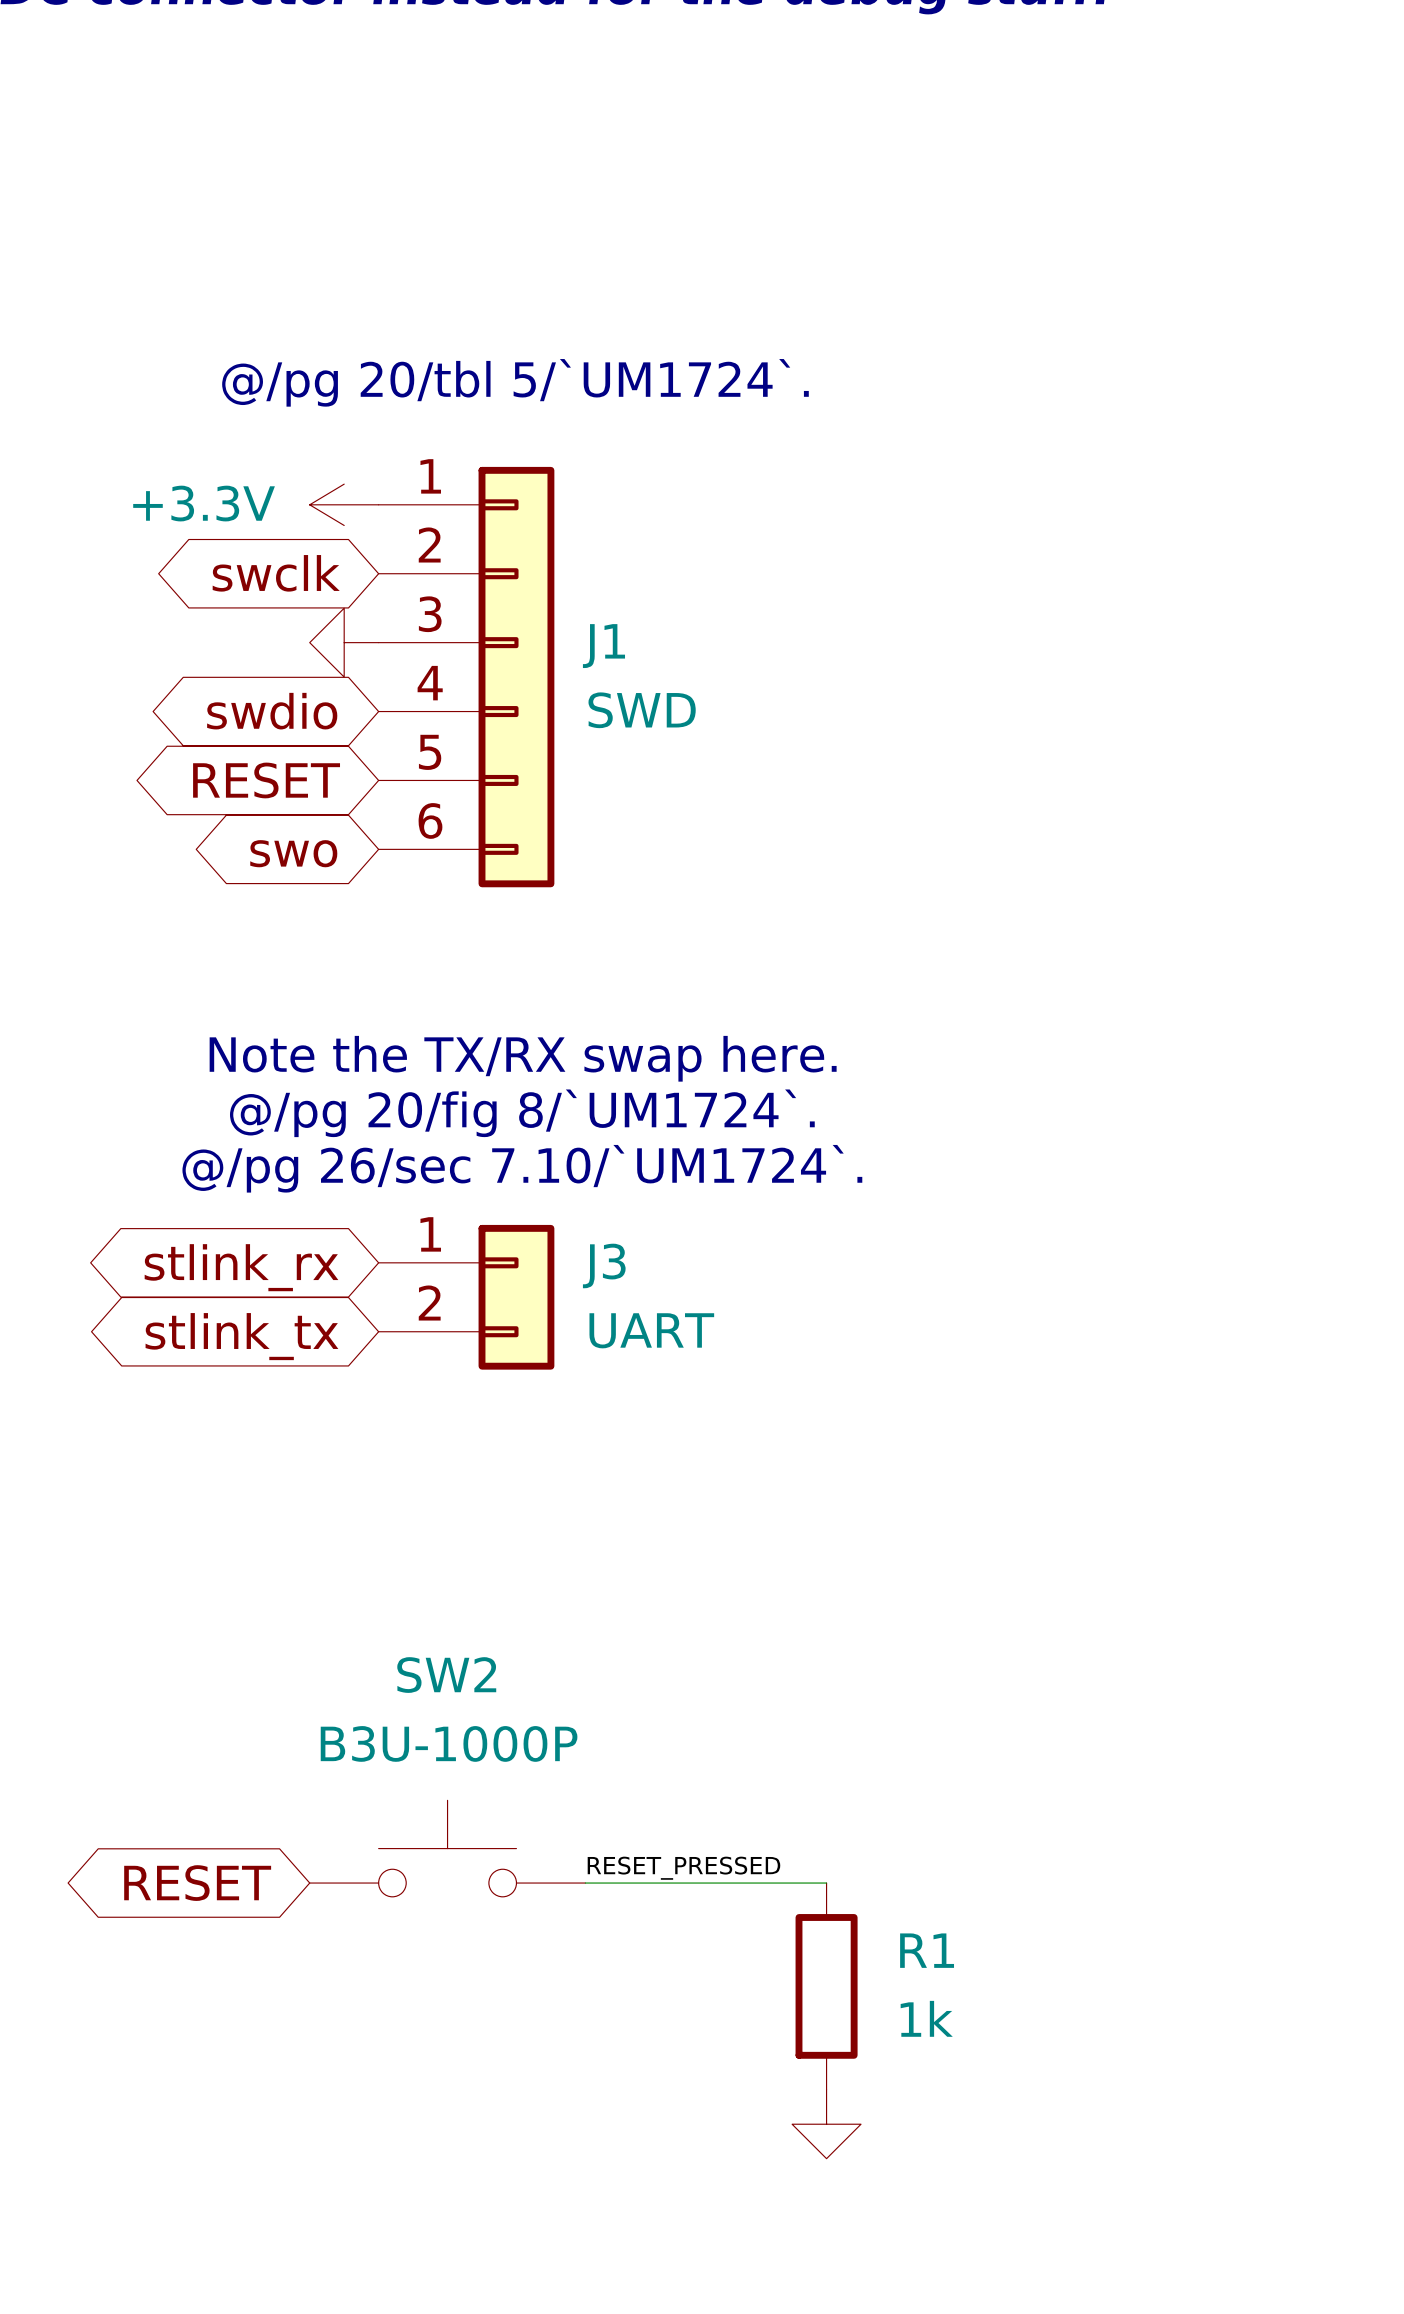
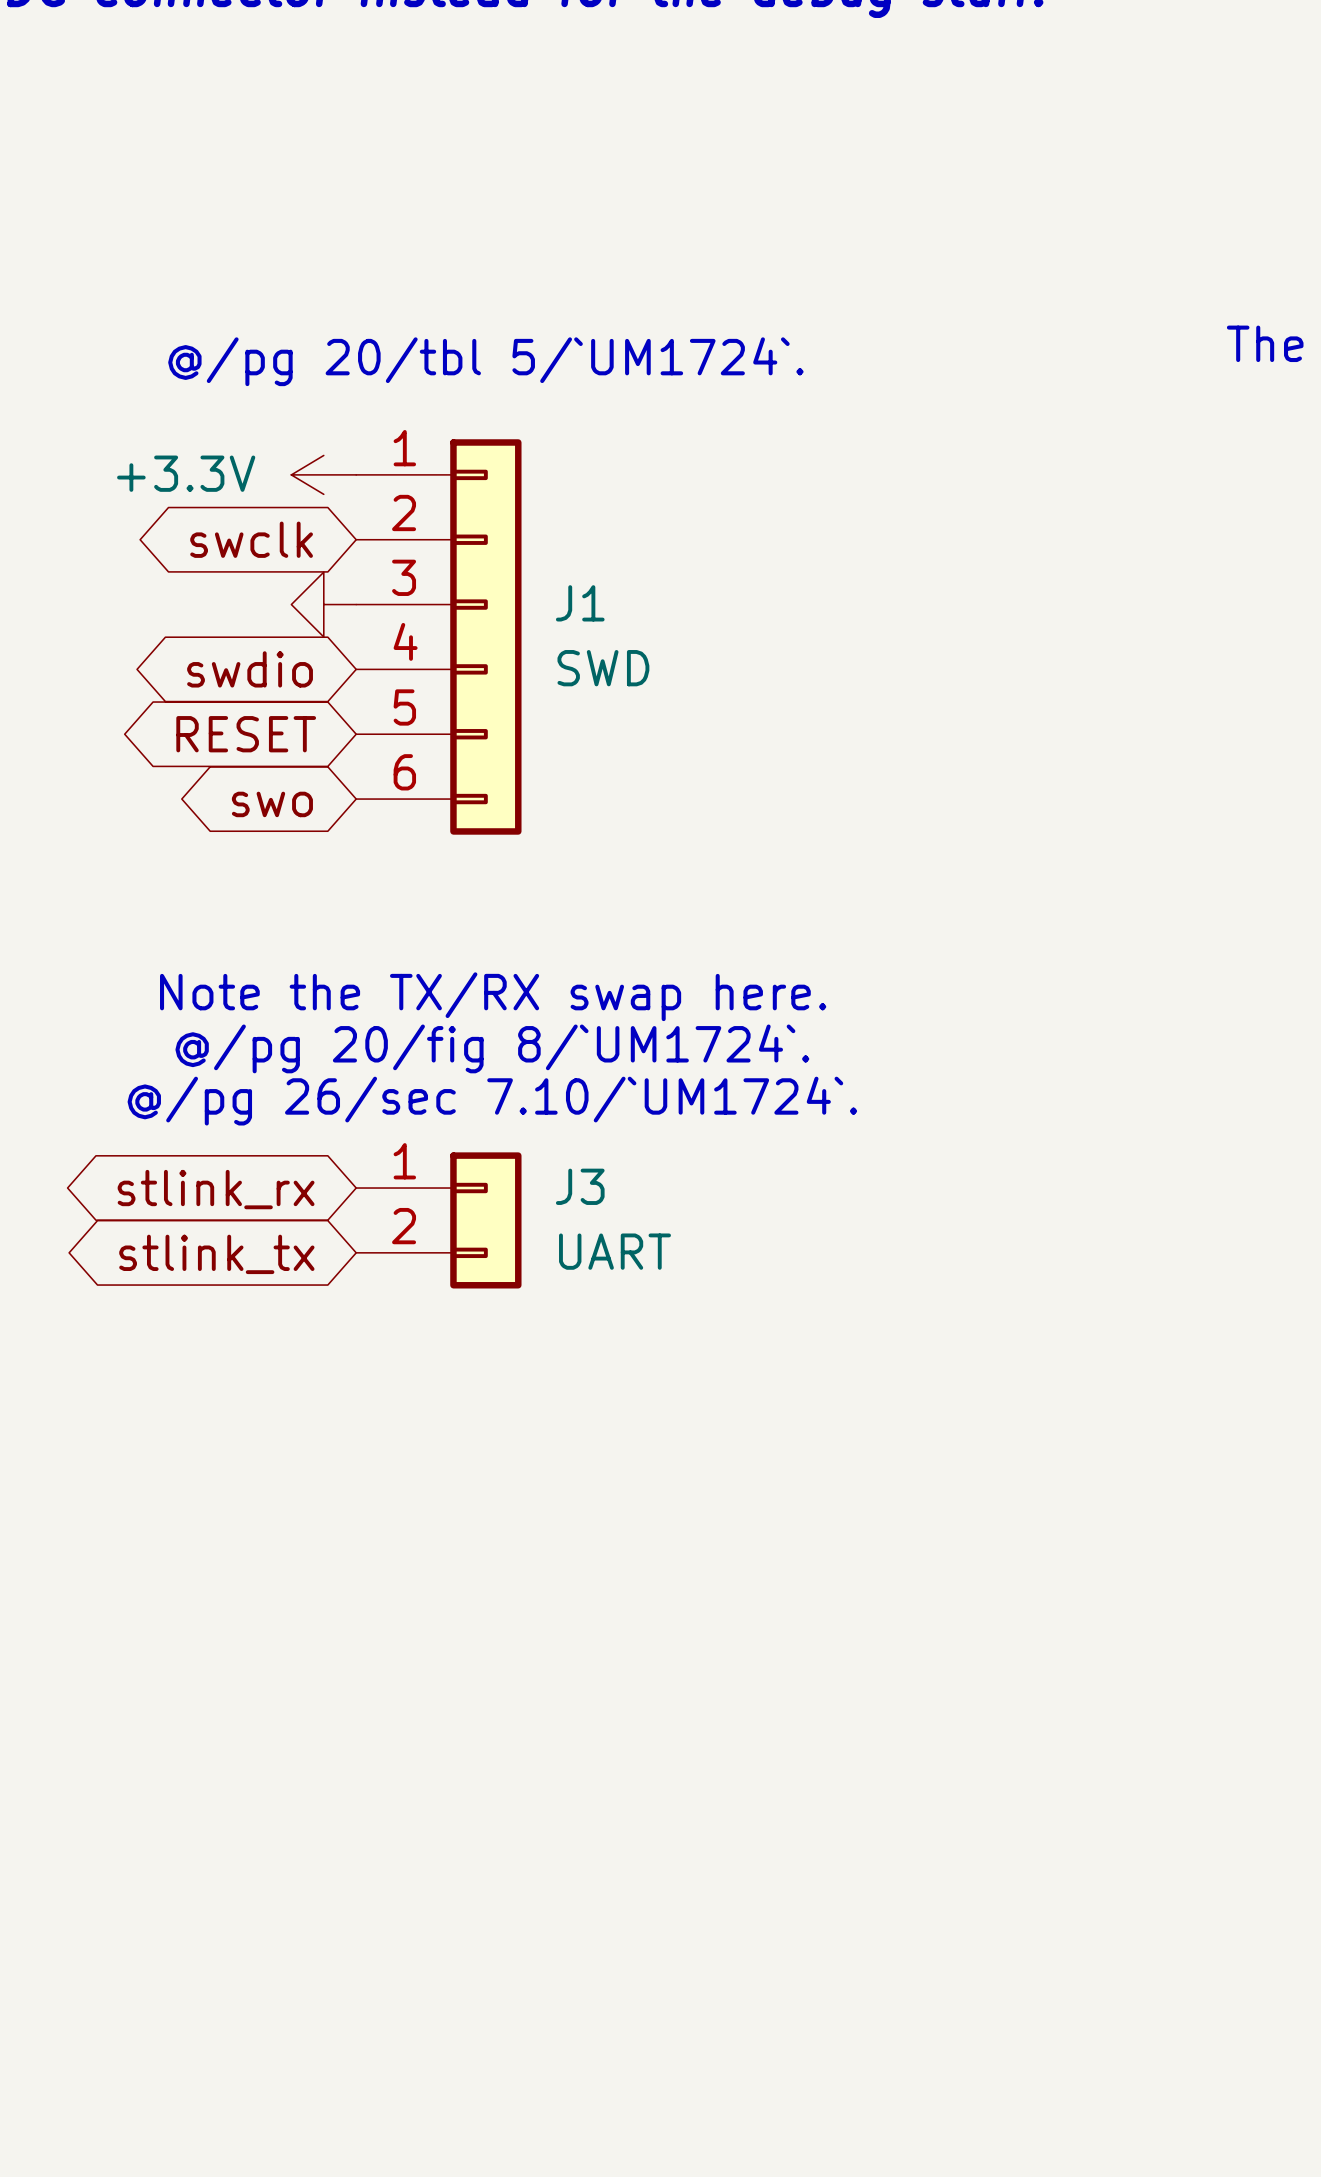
SW2: B3U-1000P (447, 1848) -> none
label: RESET_PRESSED (683, 1868) -> none
global label: RESET (197, 1883) -> none
wire: (585, 1883) (826, 1883) -> none
R1: 1k (826, 1986) -> none
power symbol: (826, 2124) -> none

